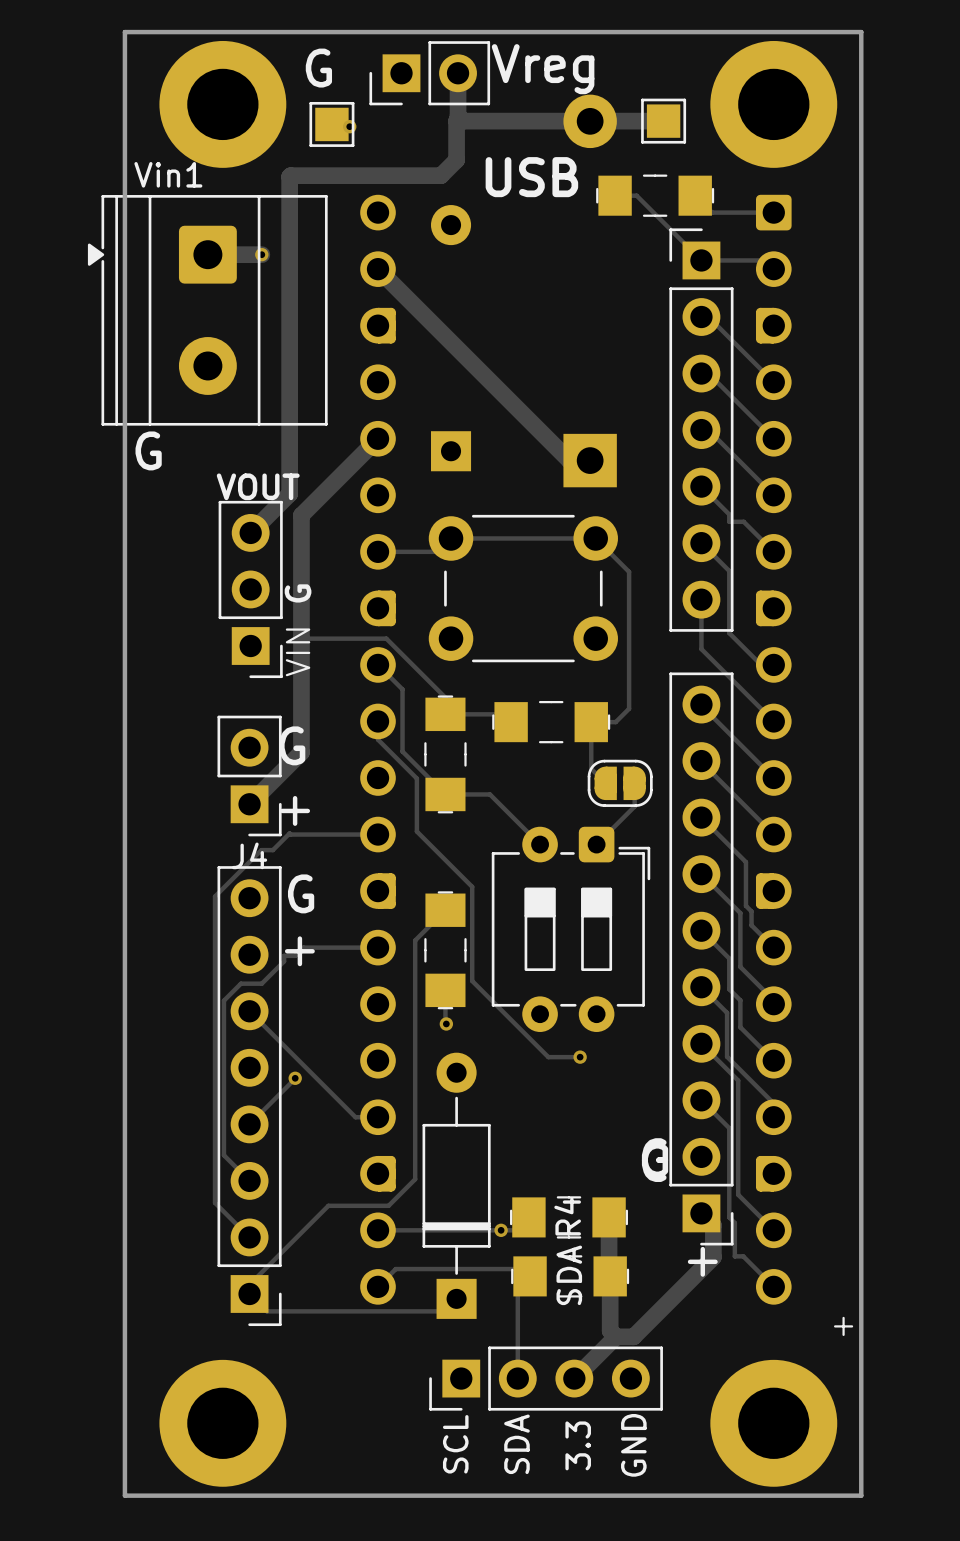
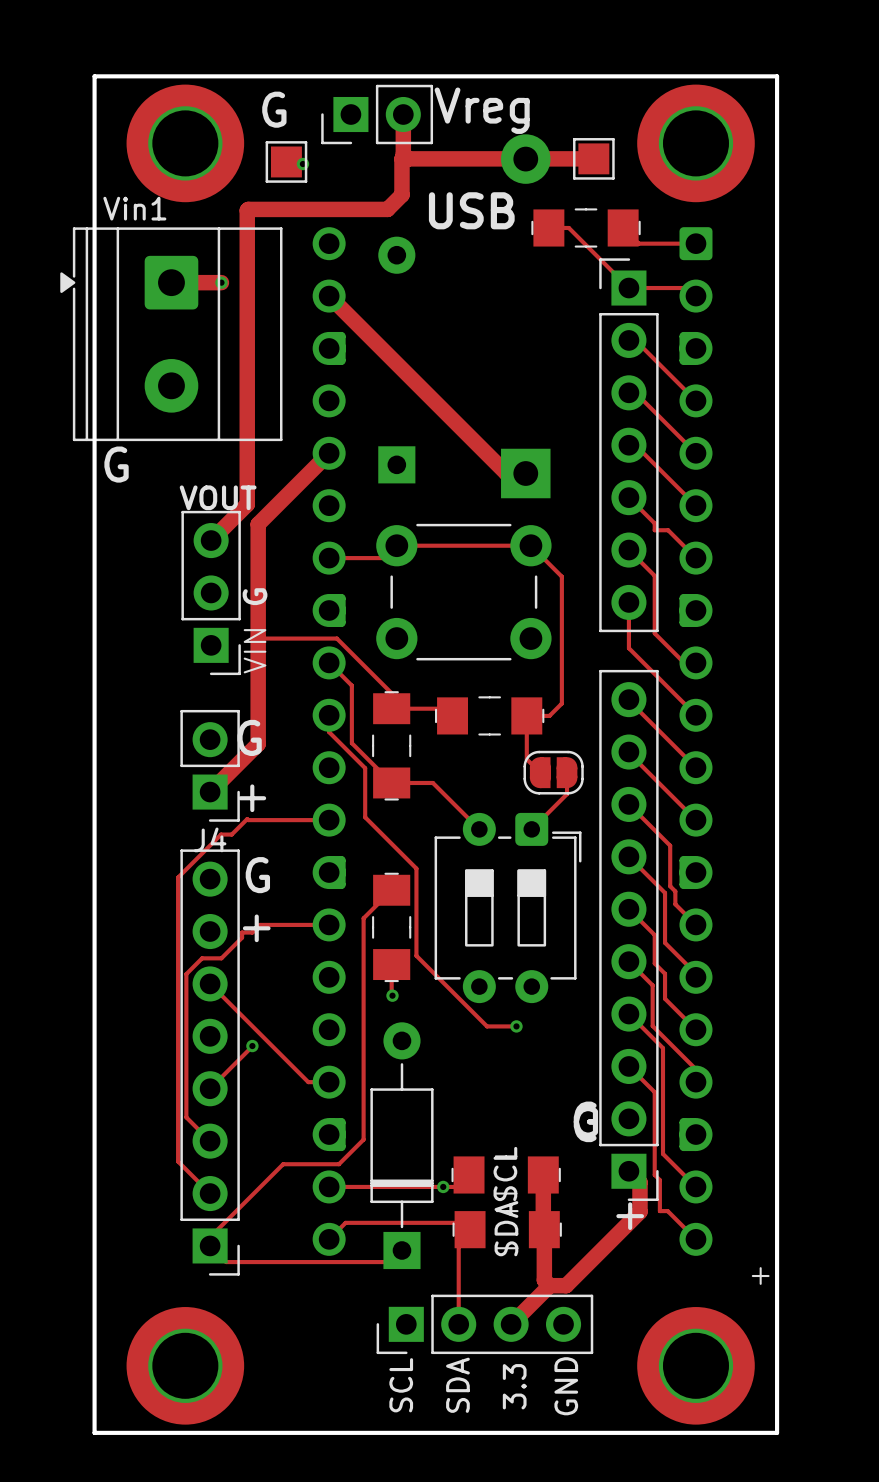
R4 name: R4 (567, 1216) -> SCL (505, 1174)

